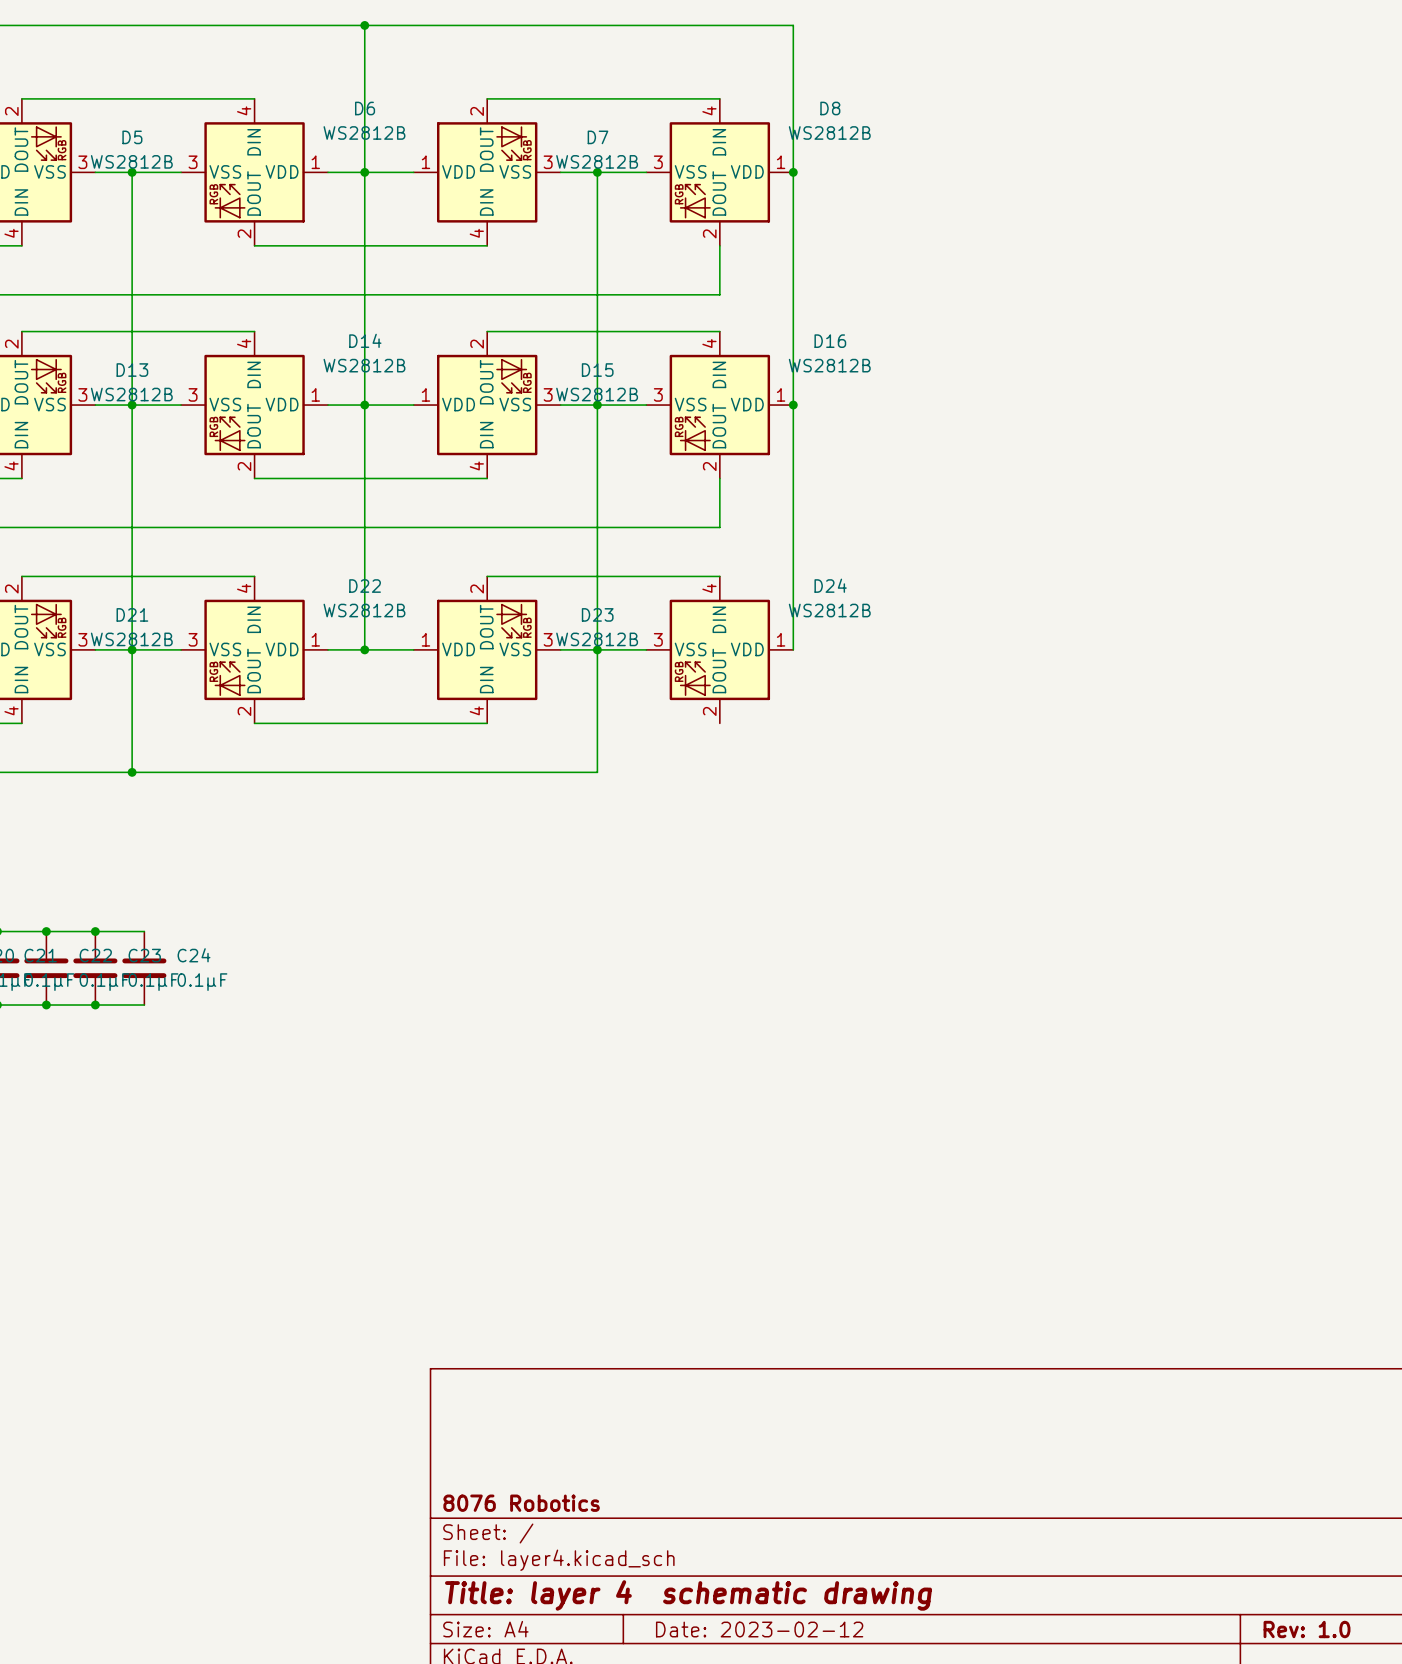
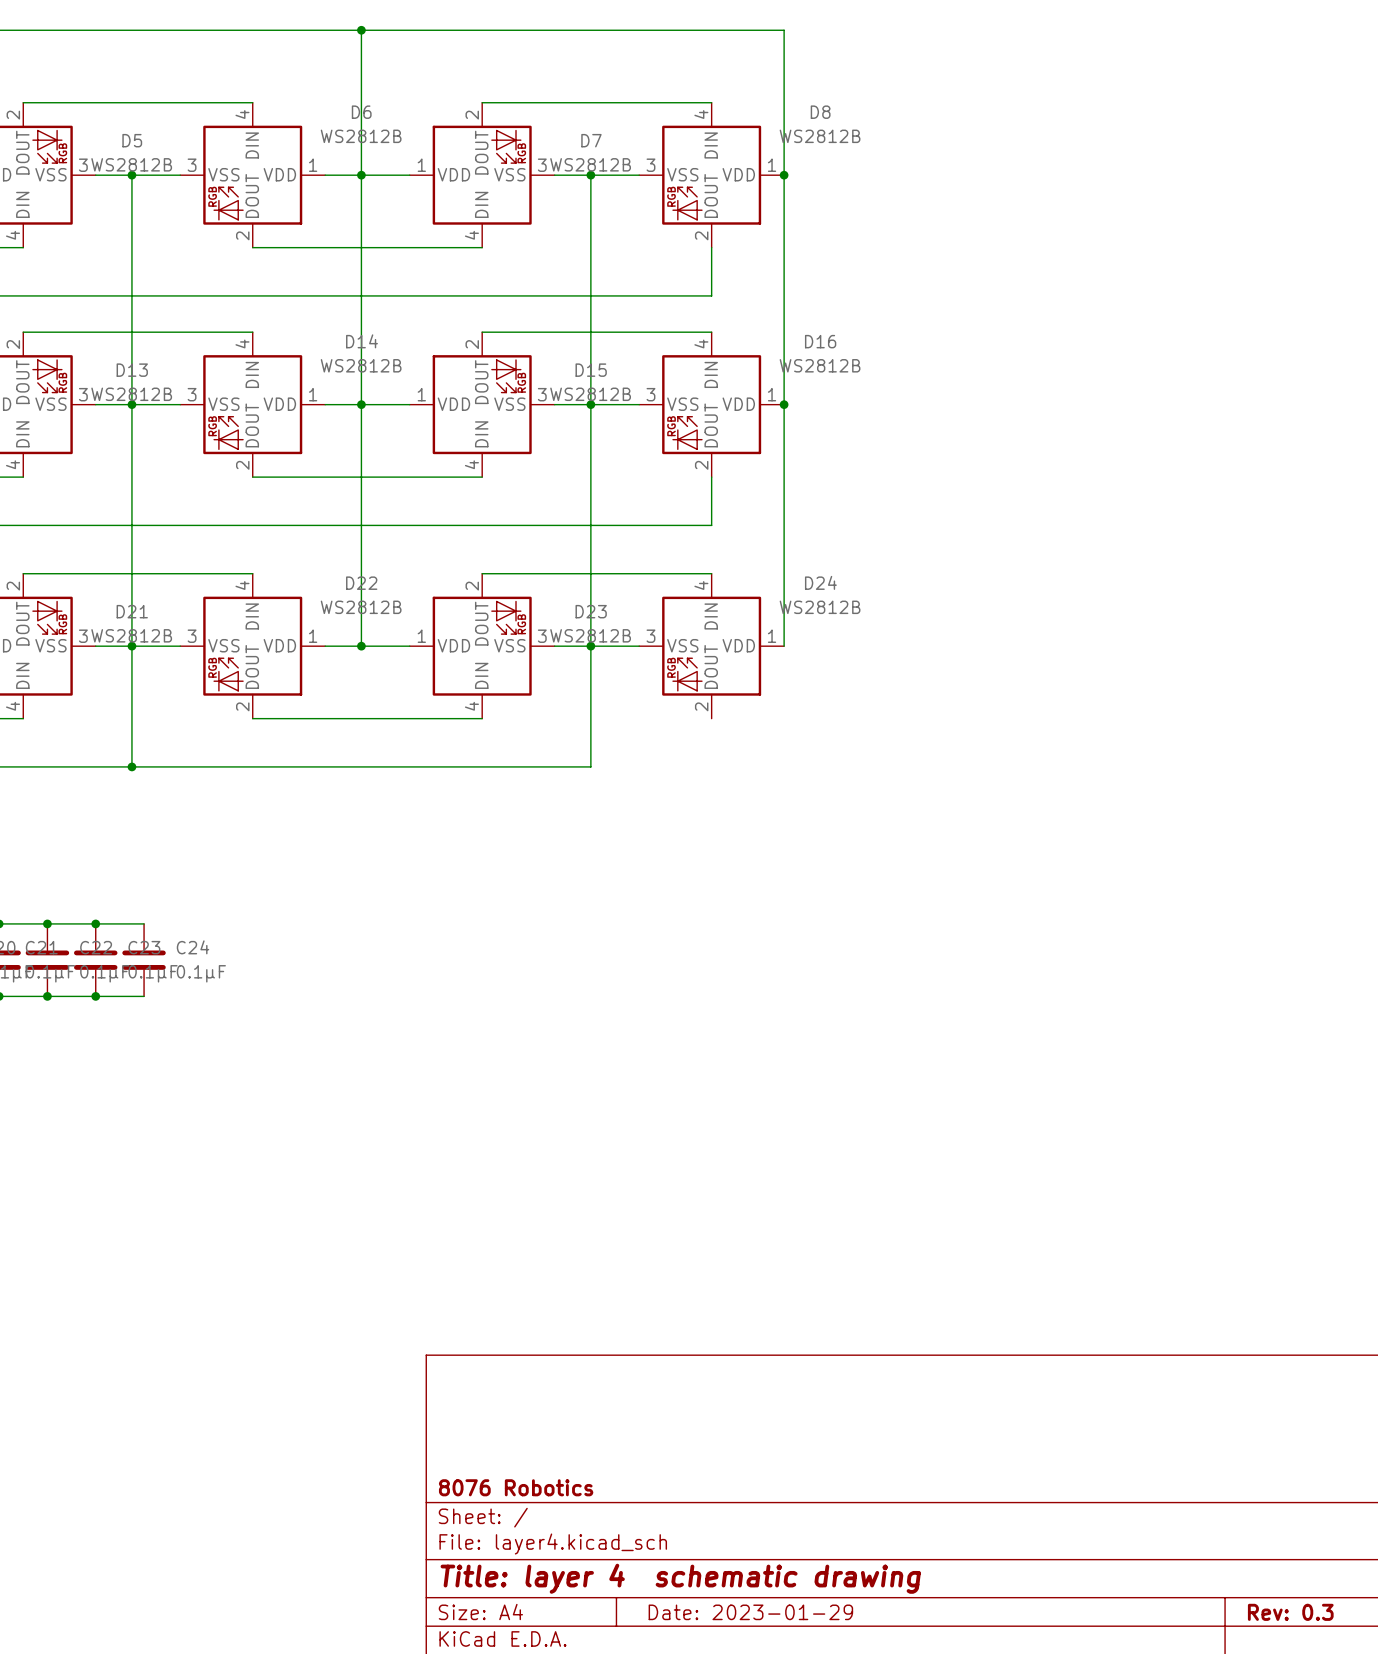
title block: Date: 2023-02-12 (759, 1629) -> Date: 2023-01-29 (750, 1612)
title block: Rev: 1.0 (1307, 1629) -> Rev: 0.3 (1290, 1612)

